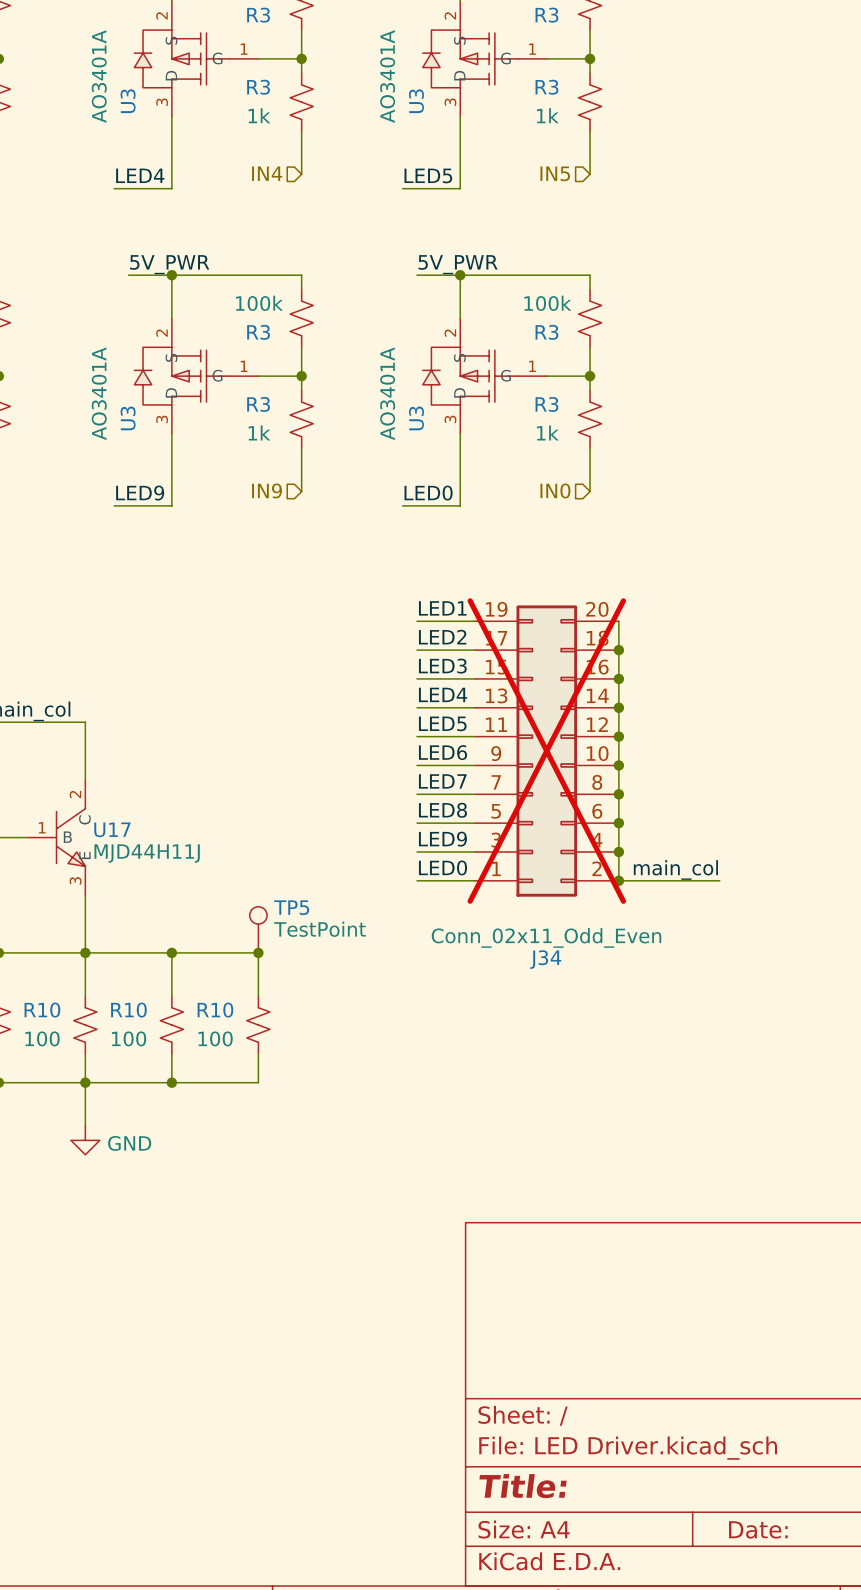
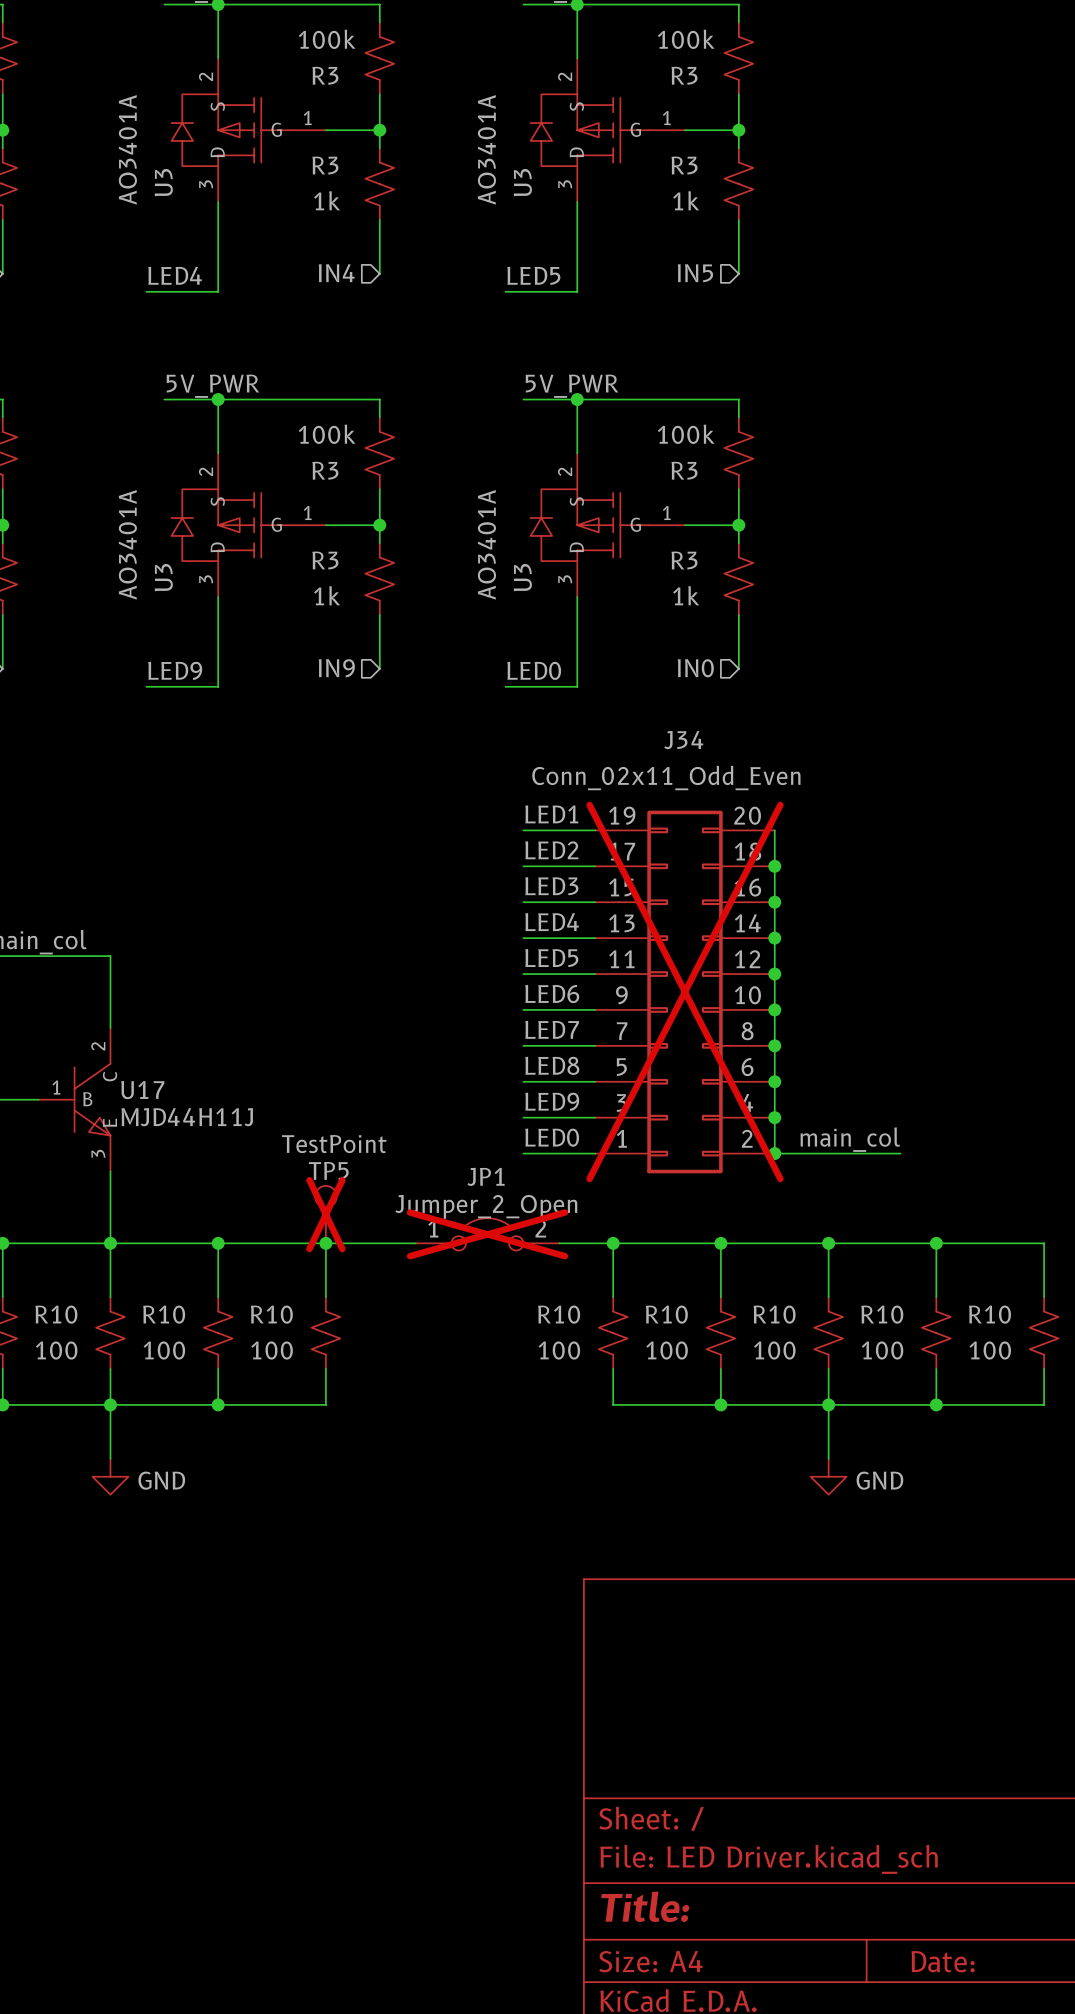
TP5 name position: TP5 (291, 907) -> TP5 (328, 1170)
TP5 do-not-place cross: none -> (325, 1214)
TP5 value position: TestPoint (320, 929) -> TestPoint (334, 1144)
J34 value position: Conn_02x11_Odd_Even (546, 937) -> Conn_02x11_Odd_Even (666, 777)
JP1: none -> Jumper_2_Open (487, 1234)
wire: none -> (325, 1243) (415, 1243)
wire: none -> (559, 1243) (1044, 1243) (1044, 1297)
wire: none -> (613, 1243) (613, 1297)
junction: none -> (613, 1243)
wire: none -> (720, 1243) (720, 1297)
junction: none -> (720, 1243)
wire: none -> (828, 1243) (828, 1297)
junction: none -> (828, 1243)
wire: none -> (936, 1243) (936, 1297)
junction: none -> (936, 1243)
J34 name position: J34 (545, 959) -> J34 (683, 740)
R10: none -> 100 (613, 1333)
R10: none -> 100 (720, 1333)
R10: none -> 100 (828, 1333)
R10: none -> 100 (936, 1333)
R10: none -> 100 (1044, 1333)
wire: none -> (613, 1369) (613, 1404) (1044, 1404) (1044, 1369)
wire: none -> (720, 1369) (720, 1404)
wire: none -> (828, 1369) (828, 1458)
wire: none -> (936, 1369) (936, 1404)
junction: none -> (720, 1404)
junction: none -> (828, 1404)
junction: none -> (936, 1404)
power symbol: none -> GND (828, 1476)

